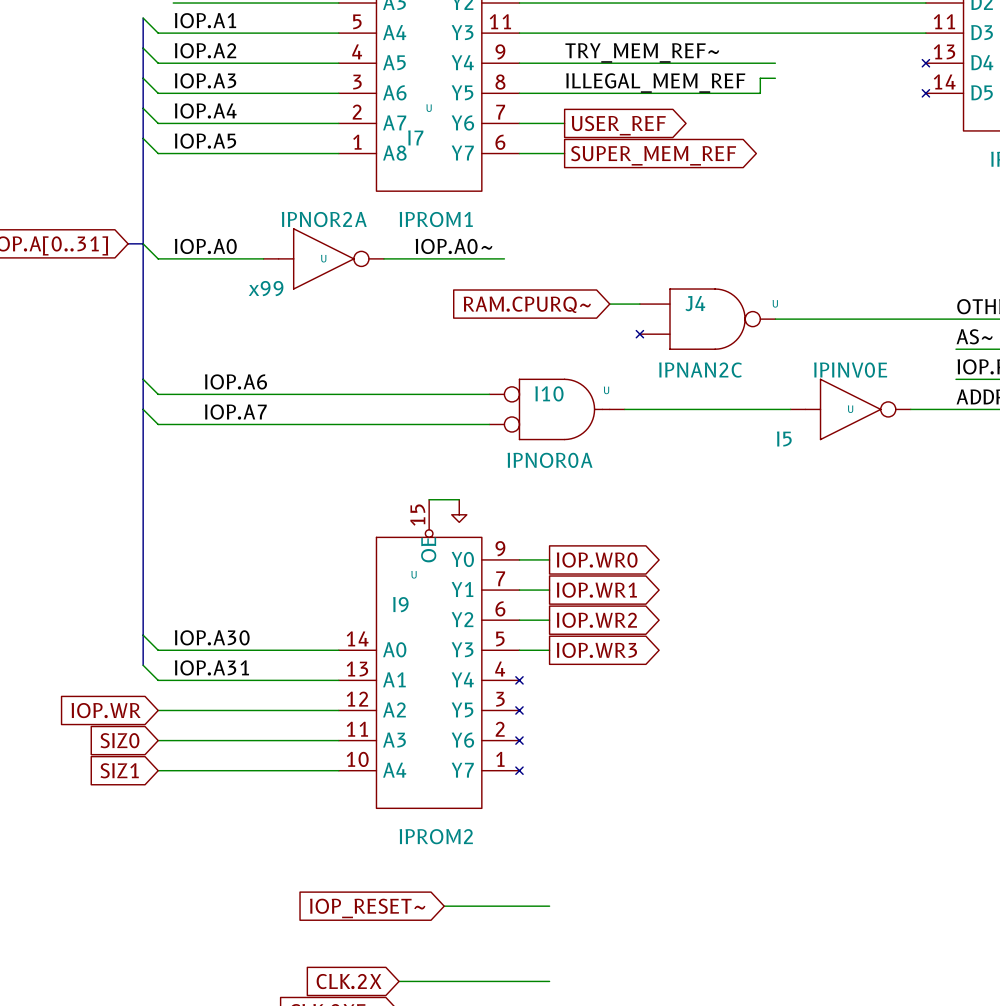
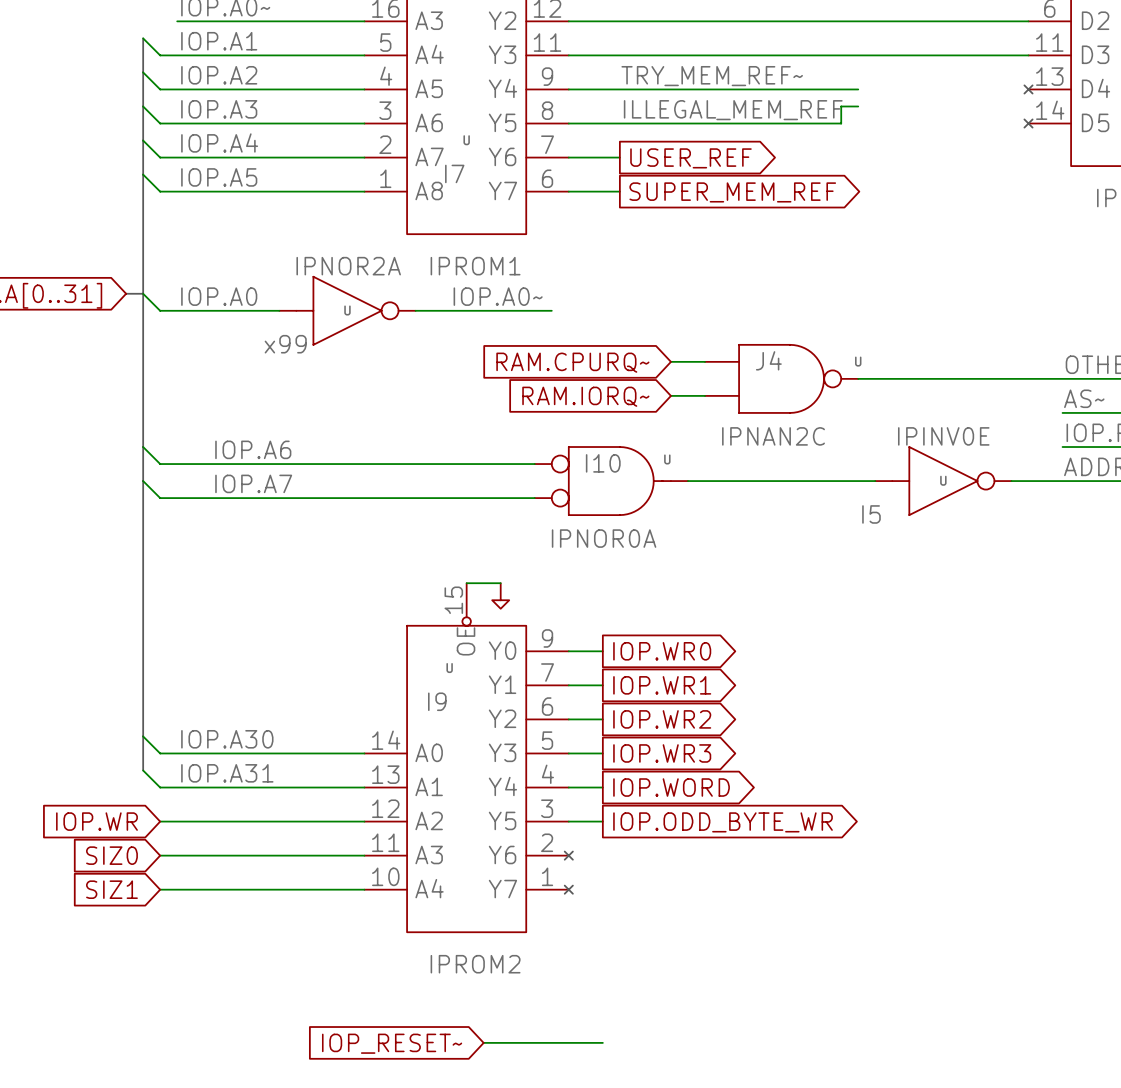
global label: none -> RAM.IORQ~ (585, 396)
wire: none -> (670, 395) (705, 395)
no-connect mark: (639, 334) -> none
wire: none -> (568, 787) (602, 787)
no-connect mark: (519, 680) -> none
global label: none -> IOP.WORD (671, 787)
wire: none -> (568, 821) (602, 821)
no-connect mark: (519, 710) -> none
global label: none -> IOP.ODD_BYTE_WR (723, 822)

